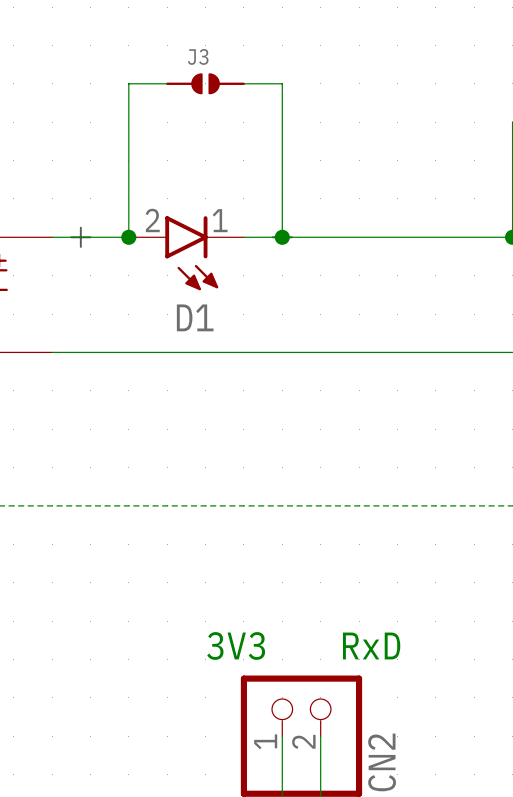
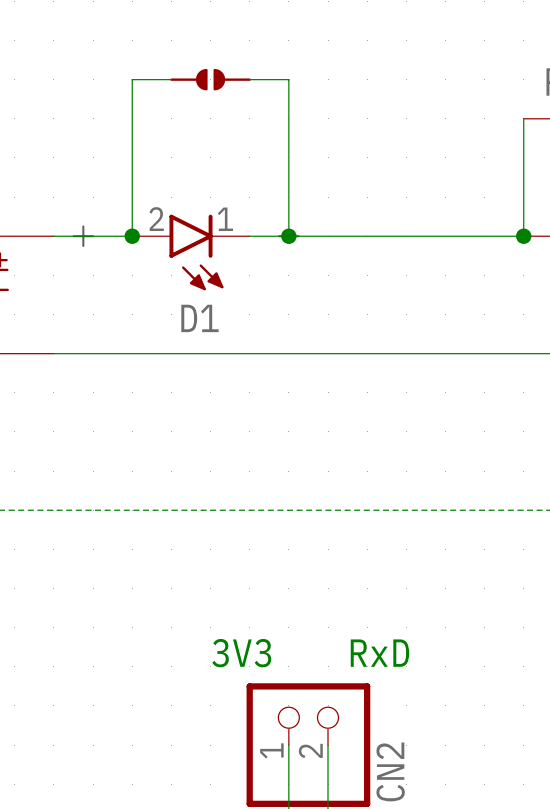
J3 name: J3 (198, 56) -> none

